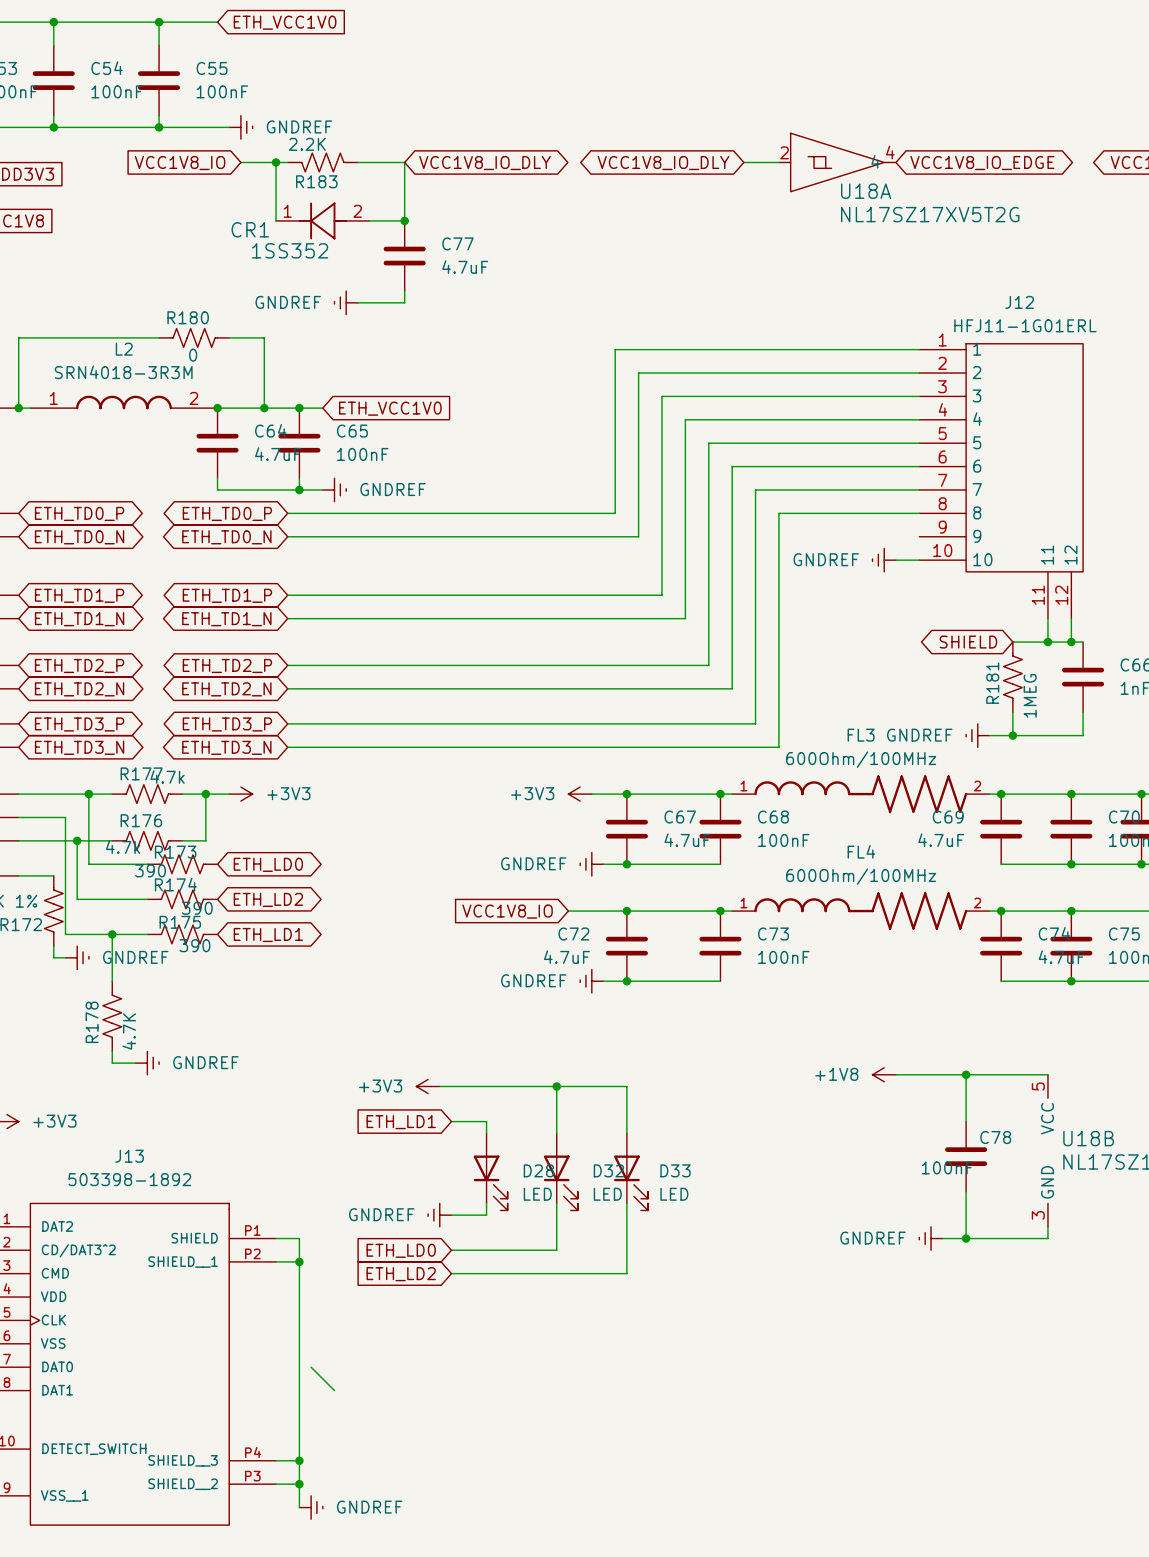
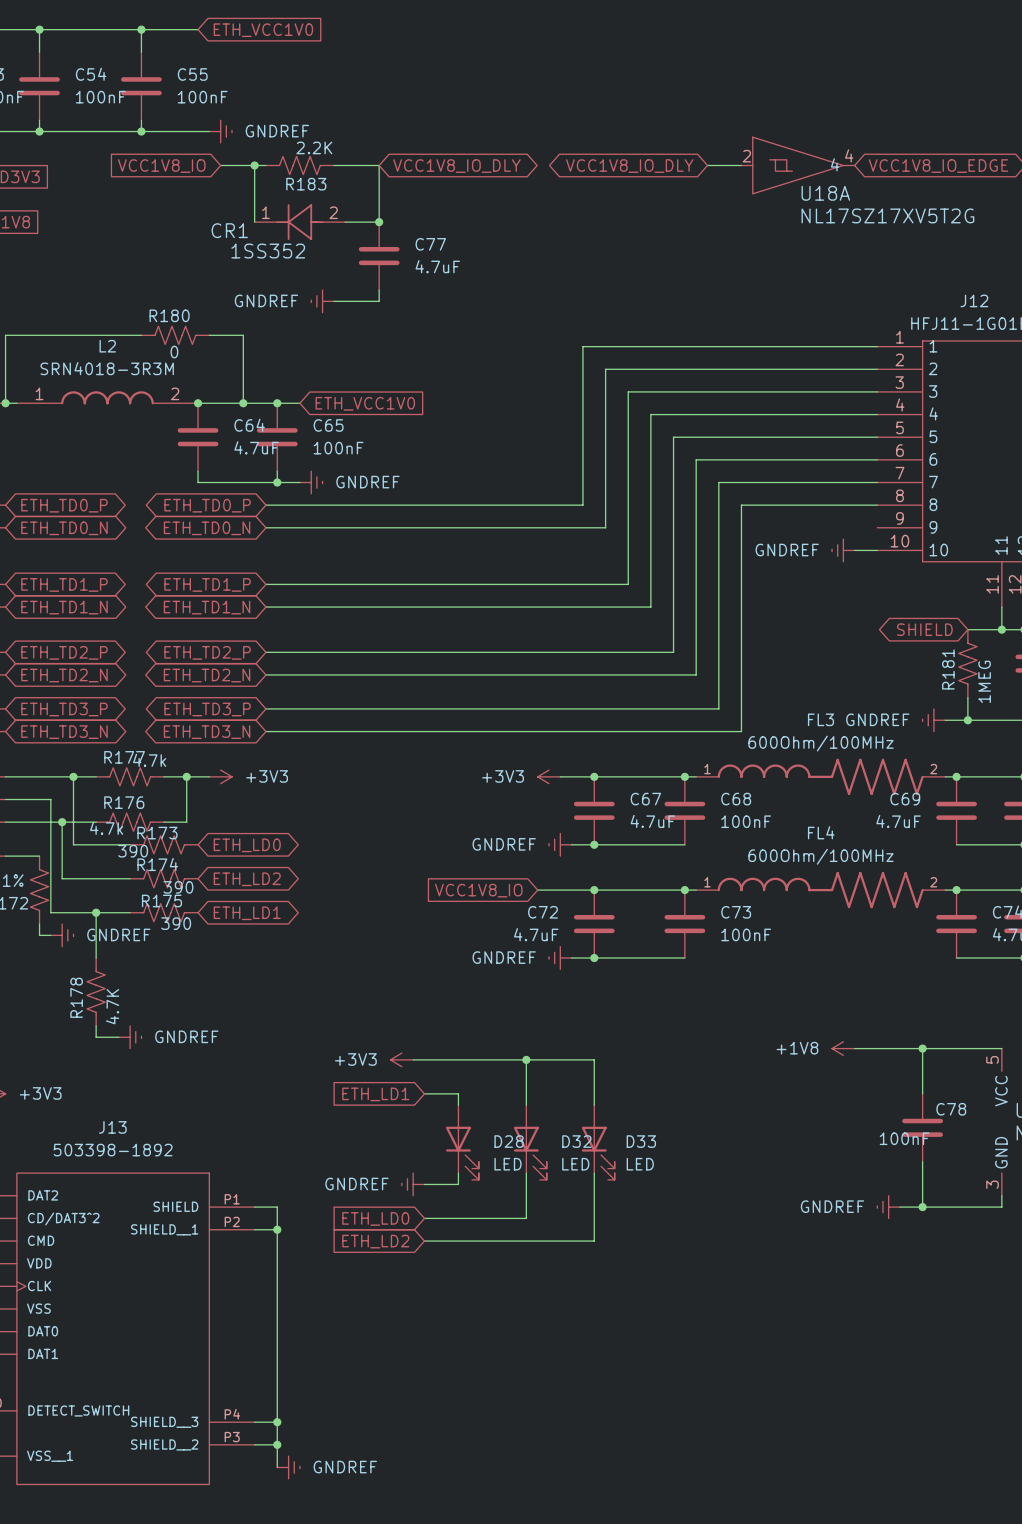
R183 flip: as is (322, 162) -> left-right (299, 165)
wire: (311, 1367) (334, 1390) -> none

